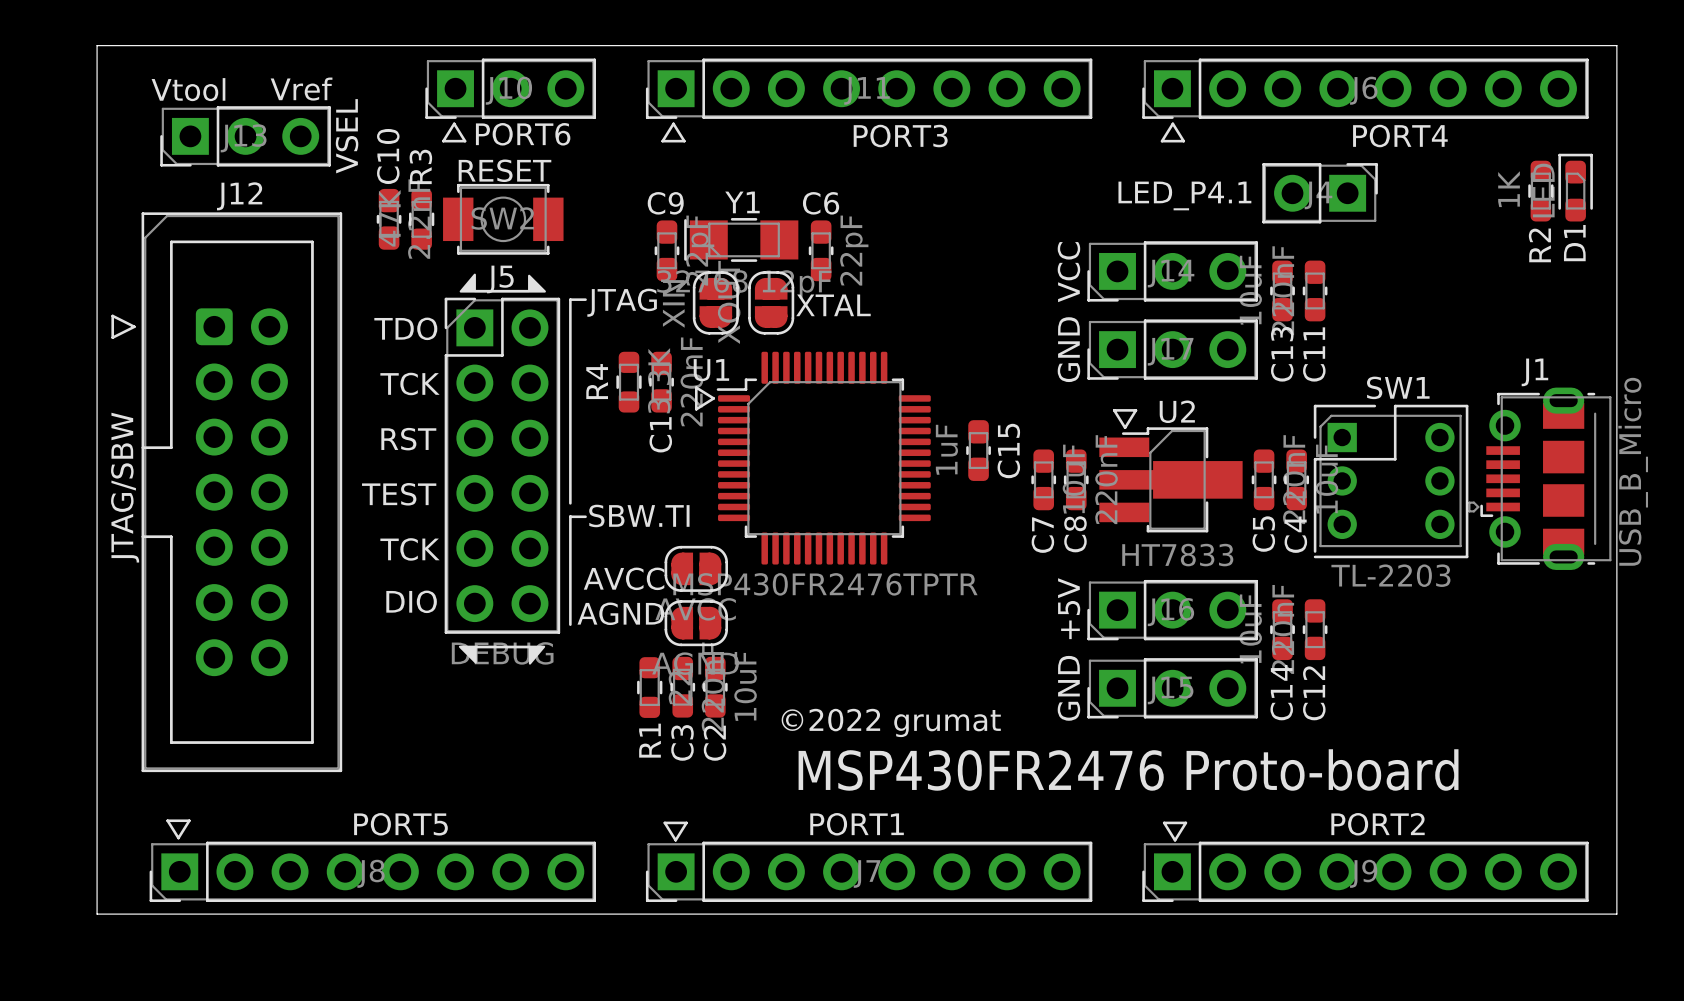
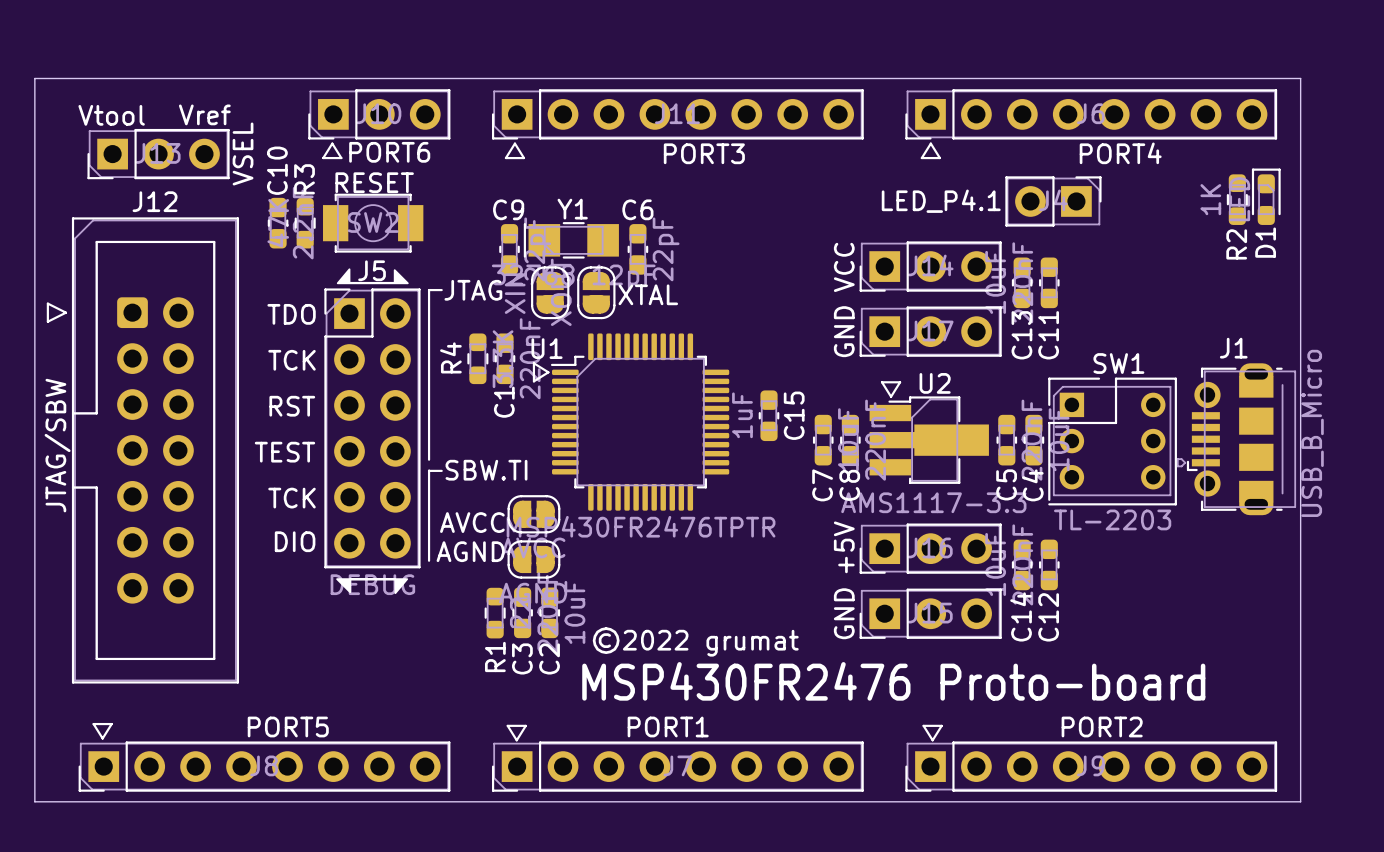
U2 value: HT7833 (1177, 555) -> AMS1117-3.3 (933, 502)

